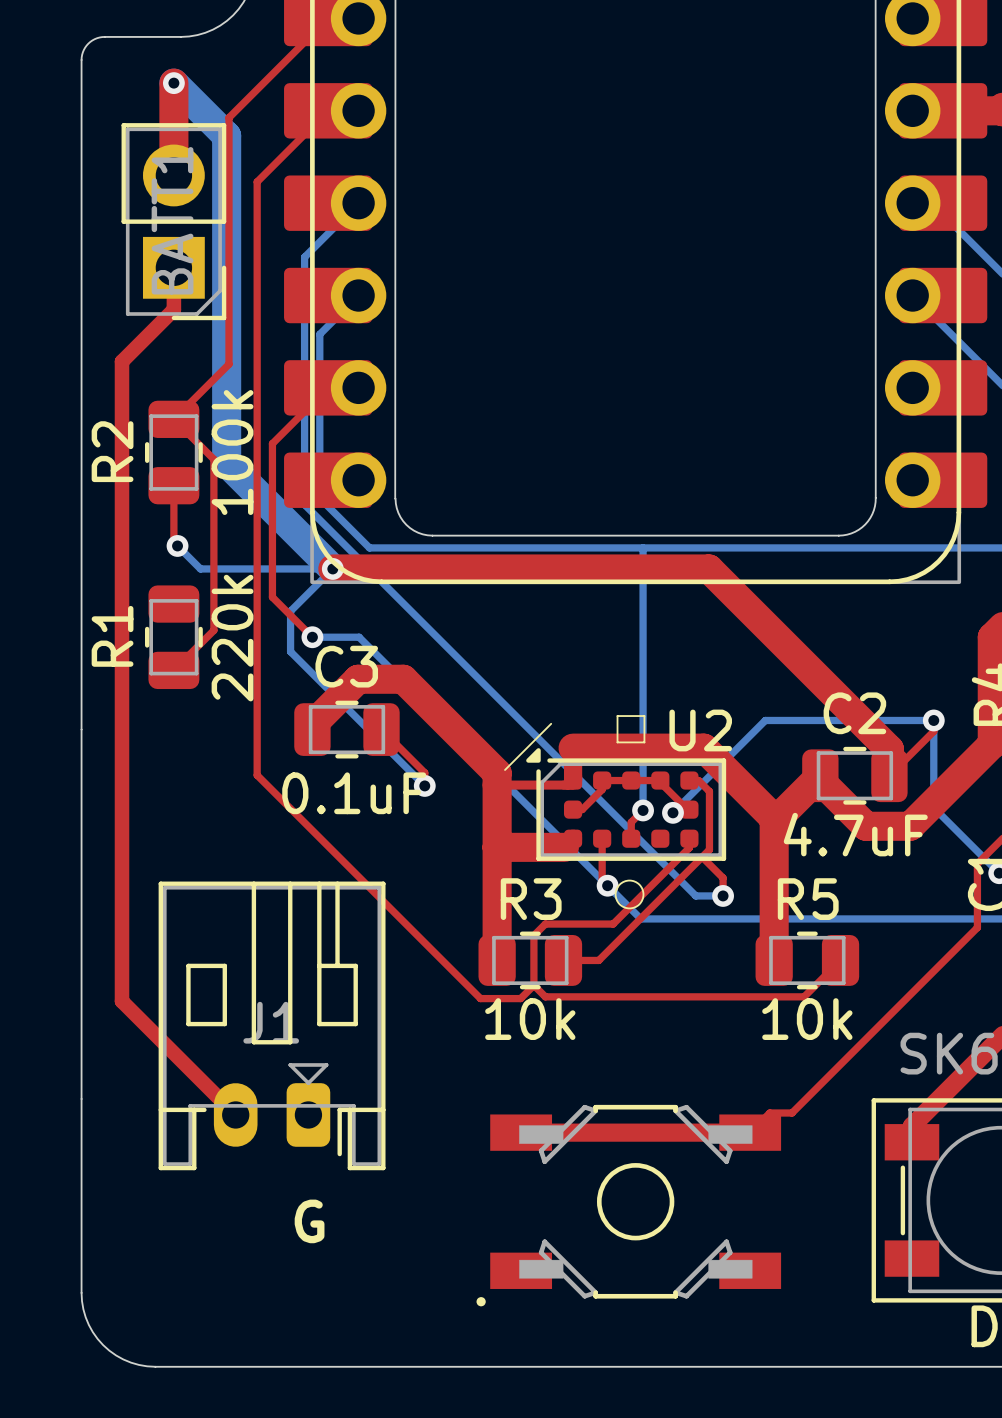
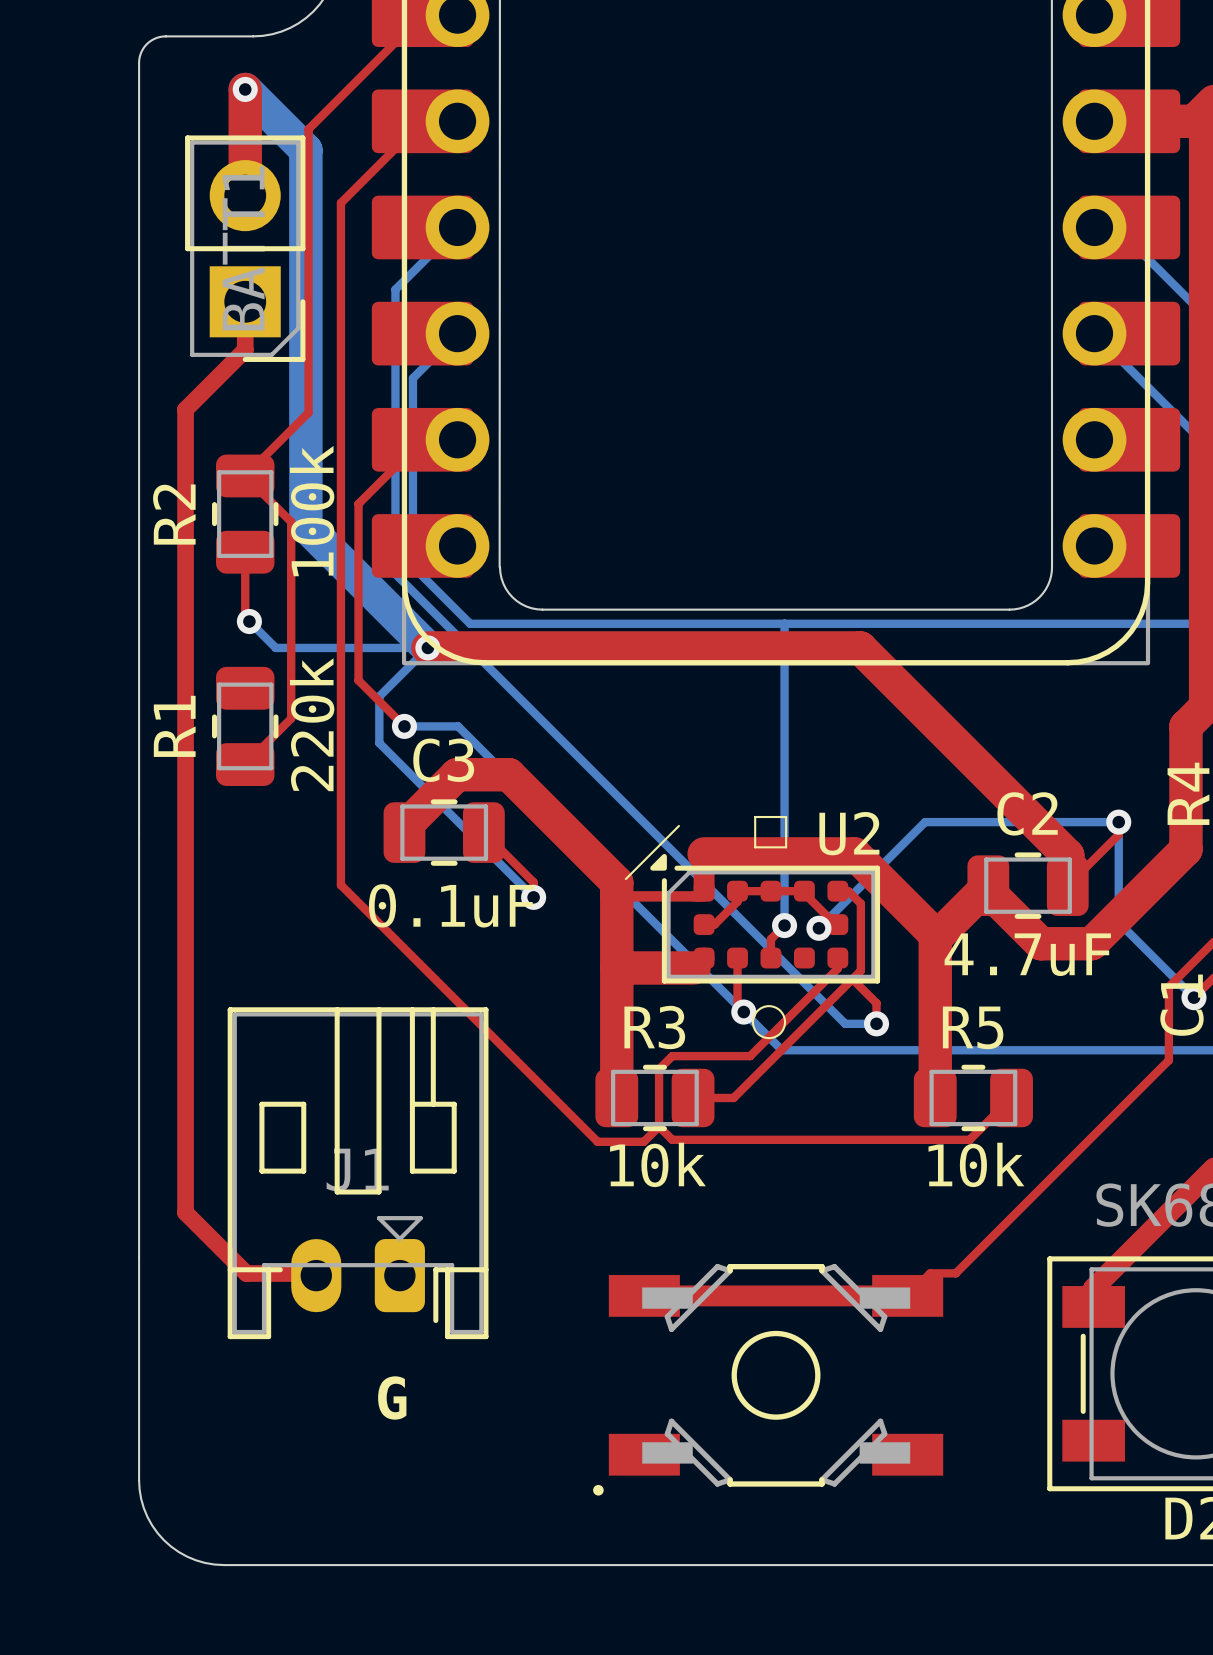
top track: (121, 1001) (235, 1114) -> (185, 1144) (185, 1212) (246, 1273) (316, 1273)

